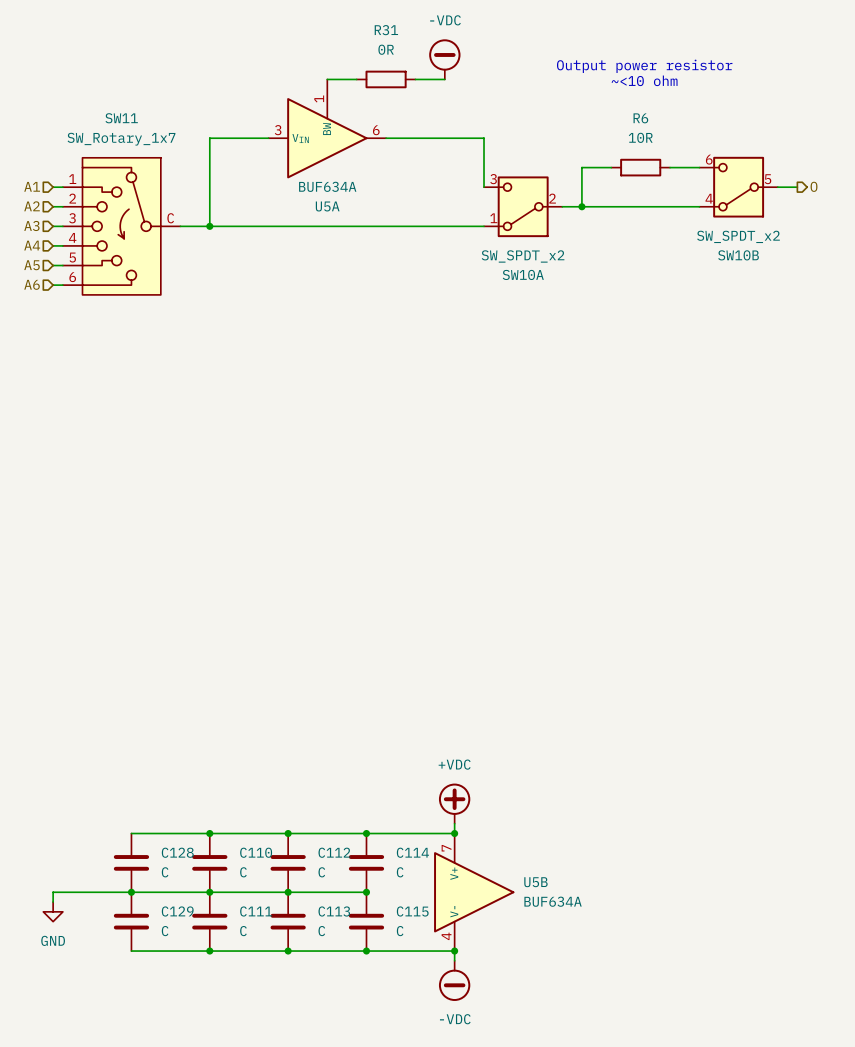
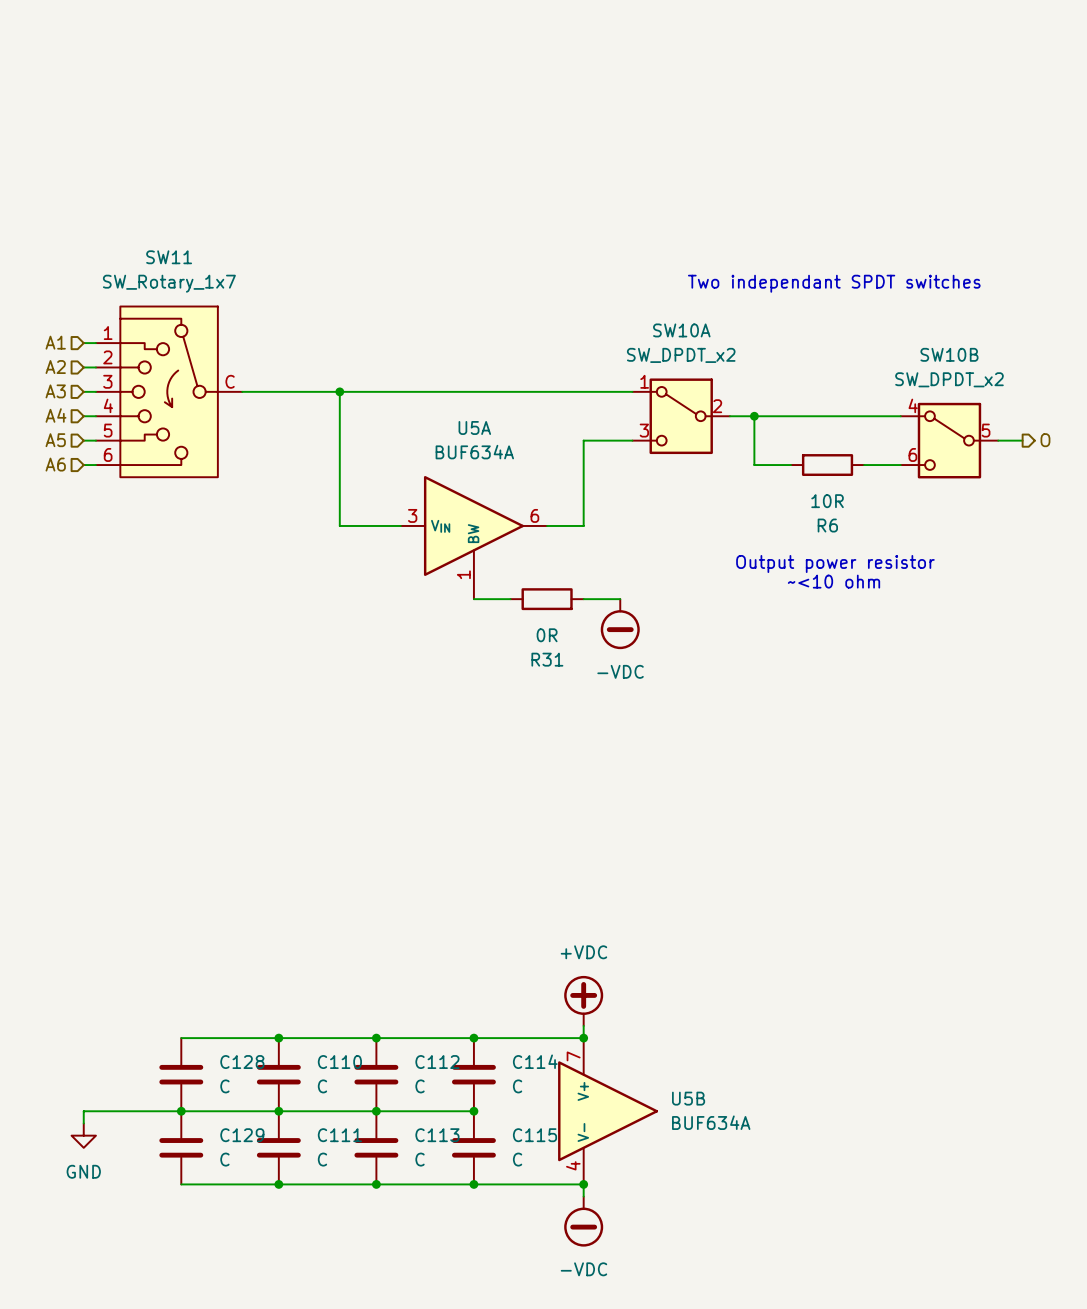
R31 name position: R31 (386, 30) -> R31 (547, 659)
R31 value position: 0R (386, 49) -> 0R (547, 635)
power symbol: -VDC (444, 59) -> none
text: Output power resistor (644, 66) -> none
wire: (327, 79) (356, 79) -> none
R31 position: (386, 79) -> (547, 599)
wire: (415, 79) (444, 79) -> none
text: ~<10 ohm (644, 80) -> none
R6 name position: R6 (640, 118) -> R6 (827, 525)
U5A position: (327, 128) -> (473, 537)
R6 value position: 10R (640, 137) -> 10R (827, 501)
wire: (268, 138) (209, 138) (209, 226) -> none
U5A flip: as is (327, 138) -> up-down (473, 525)
wire: (386, 138) (484, 138) (484, 187) -> none
wire: (611, 167) (581, 167) (581, 206) -> none
R6 position: (640, 167) -> (827, 465)
wire: (670, 167) (699, 167) -> none
hierarchical label position: A1 (32, 186) -> A1 (55, 342)
hierarchical label position: O (814, 186) -> O (1045, 440)
wire: (53, 187) (62, 187) -> (83, 343) (95, 343)
SW10B flip: as is (738, 187) -> up-down (949, 440)
SW10B position: (738, 187) -> (949, 440)
wire: (777, 187) (797, 187) -> (998, 440) (1022, 440)
hierarchical label position: A2 (32, 206) -> A2 (55, 367)
wire: (53, 206) (62, 206) -> (83, 367) (95, 367)
SW10A flip: as is (523, 206) -> up-down (681, 416)
SW10A position: (523, 206) -> (681, 416)
wire: (562, 206) (699, 206) -> (729, 416) (900, 416)
junction: (581, 206) -> none
hierarchical label position: A3 (31, 225) -> A3 (55, 391)
wire: (53, 226) (62, 226) -> (83, 391) (95, 391)
SW11 position: (121, 226) -> (169, 391)
wire: (180, 226) (484, 226) -> none
junction: (209, 226) -> none
text: none -> Two independant SPDT switches (834, 283)
SW10B value: SW_SPDT_x2 (738, 236) -> SW_DPDT_x2 (949, 379)
hierarchical label position: A4 (32, 245) -> A4 (55, 415)
wire: (53, 245) (62, 245) -> (83, 416) (95, 416)
SW10A value: SW_SPDT_x2 (523, 256) -> SW_DPDT_x2 (681, 355)
hierarchical label position: A5 (32, 265) -> A5 (55, 440)
wire: (53, 265) (62, 265) -> (83, 440) (95, 440)
hierarchical label position: A6 (32, 284) -> A6 (55, 464)
wire: (53, 285) (62, 285) -> (83, 465) (95, 465)
wire: none -> (242, 391) (632, 391)
wire: none -> (339, 391) (339, 525) (400, 525)
junction: none -> (339, 391)
wire: none -> (754, 416) (754, 465) (790, 465)
junction: none -> (754, 416)
wire: none -> (632, 440) (583, 440) (583, 525) (547, 525)
wire: none -> (864, 465) (900, 465)
text: none -> Output power resistor (835, 564)
text: none -> ~<10 ohm (833, 581)
wire: none -> (473, 599) (510, 599)
wire: none -> (583, 599) (620, 599)
power symbol: none -> -VDC (620, 624)

